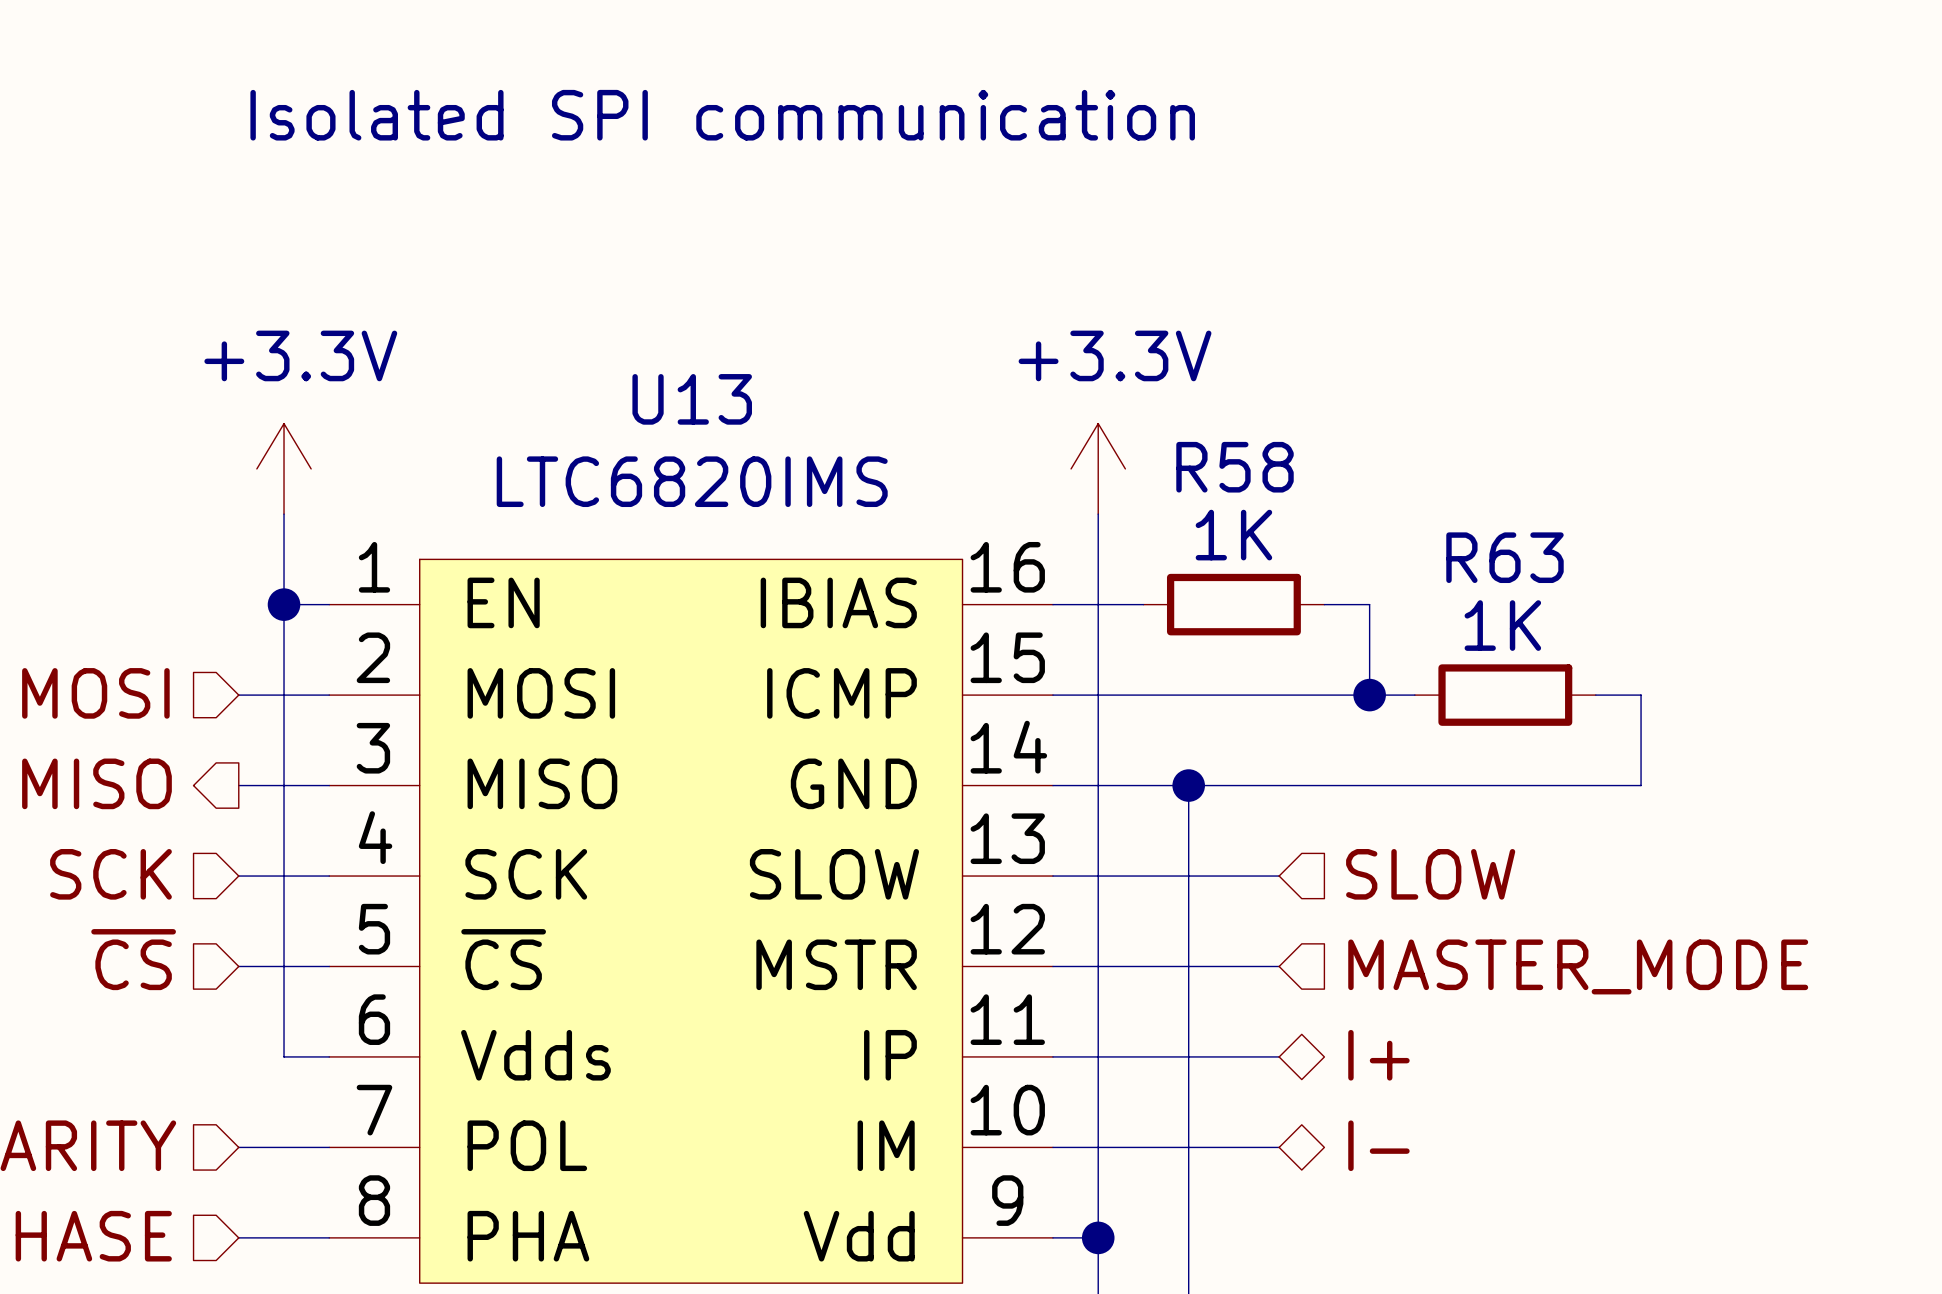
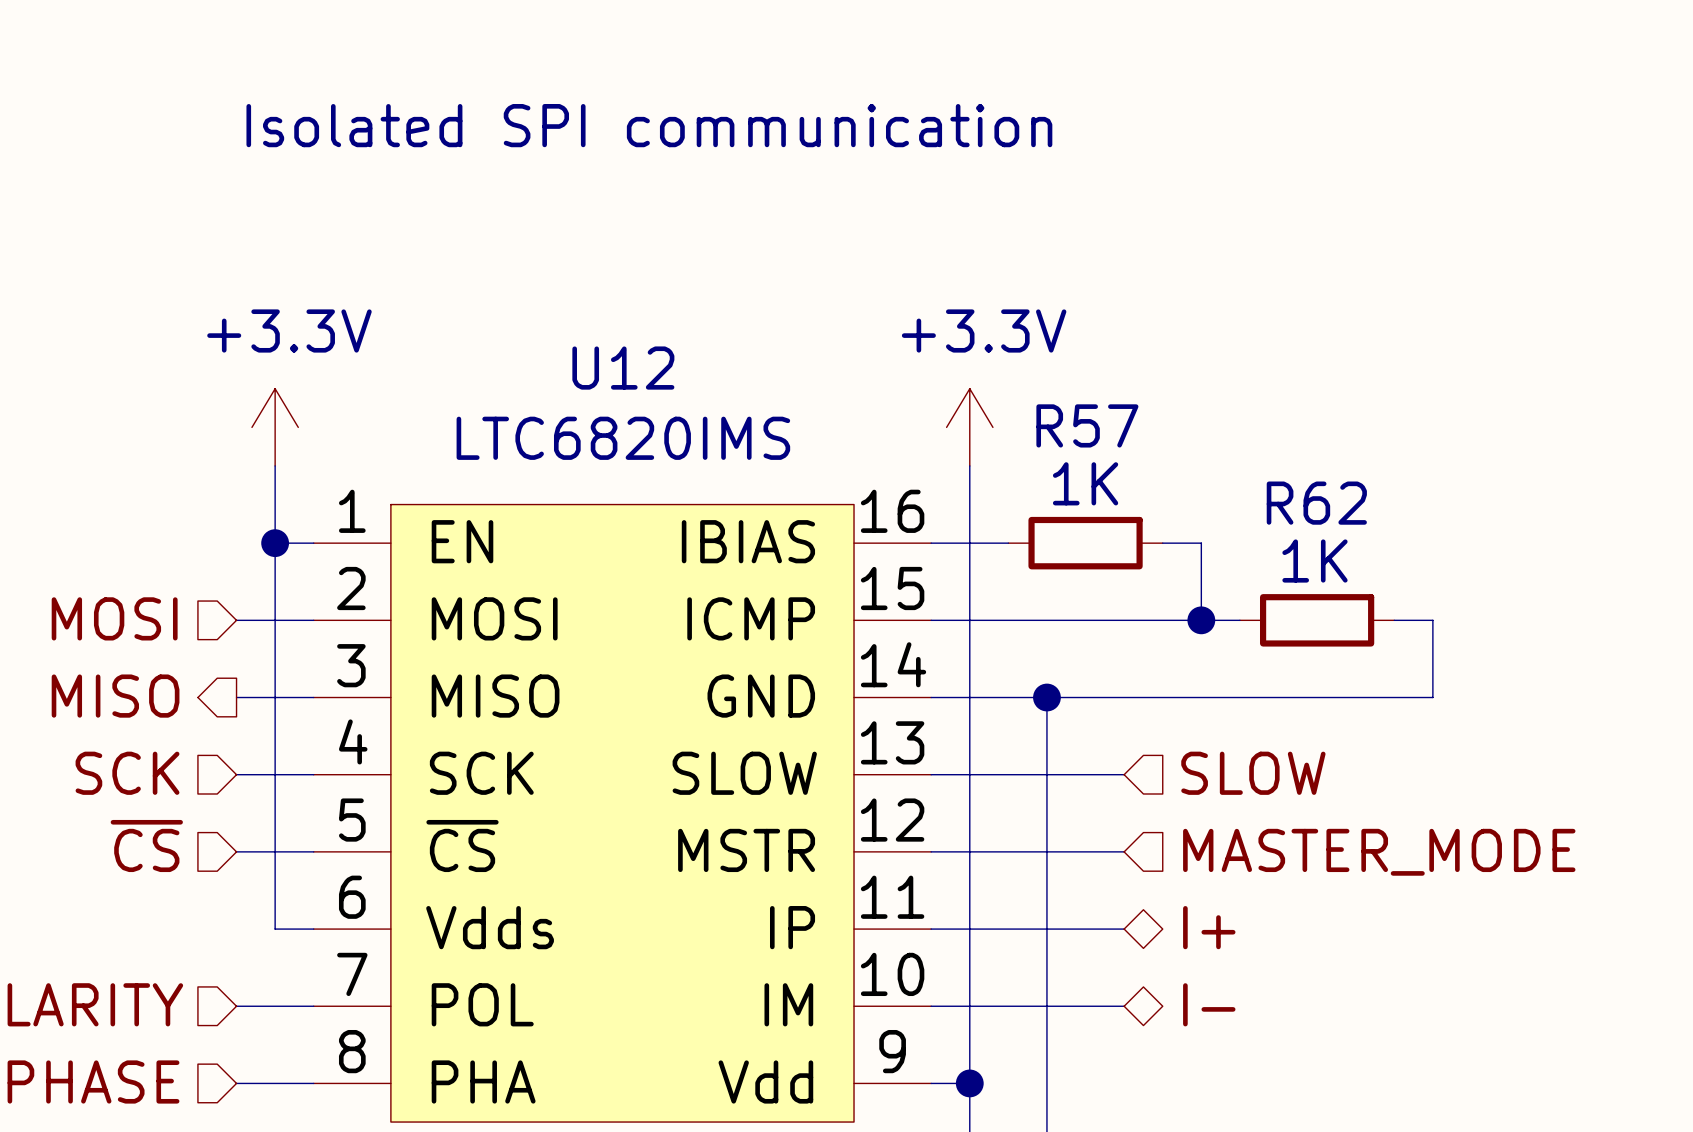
U13 name: U13 (692, 399) -> U12 (623, 368)
R58 name: R58 (1235, 467) -> R57 (1087, 425)
R63 name: R63 (1504, 557) -> R62 (1316, 503)

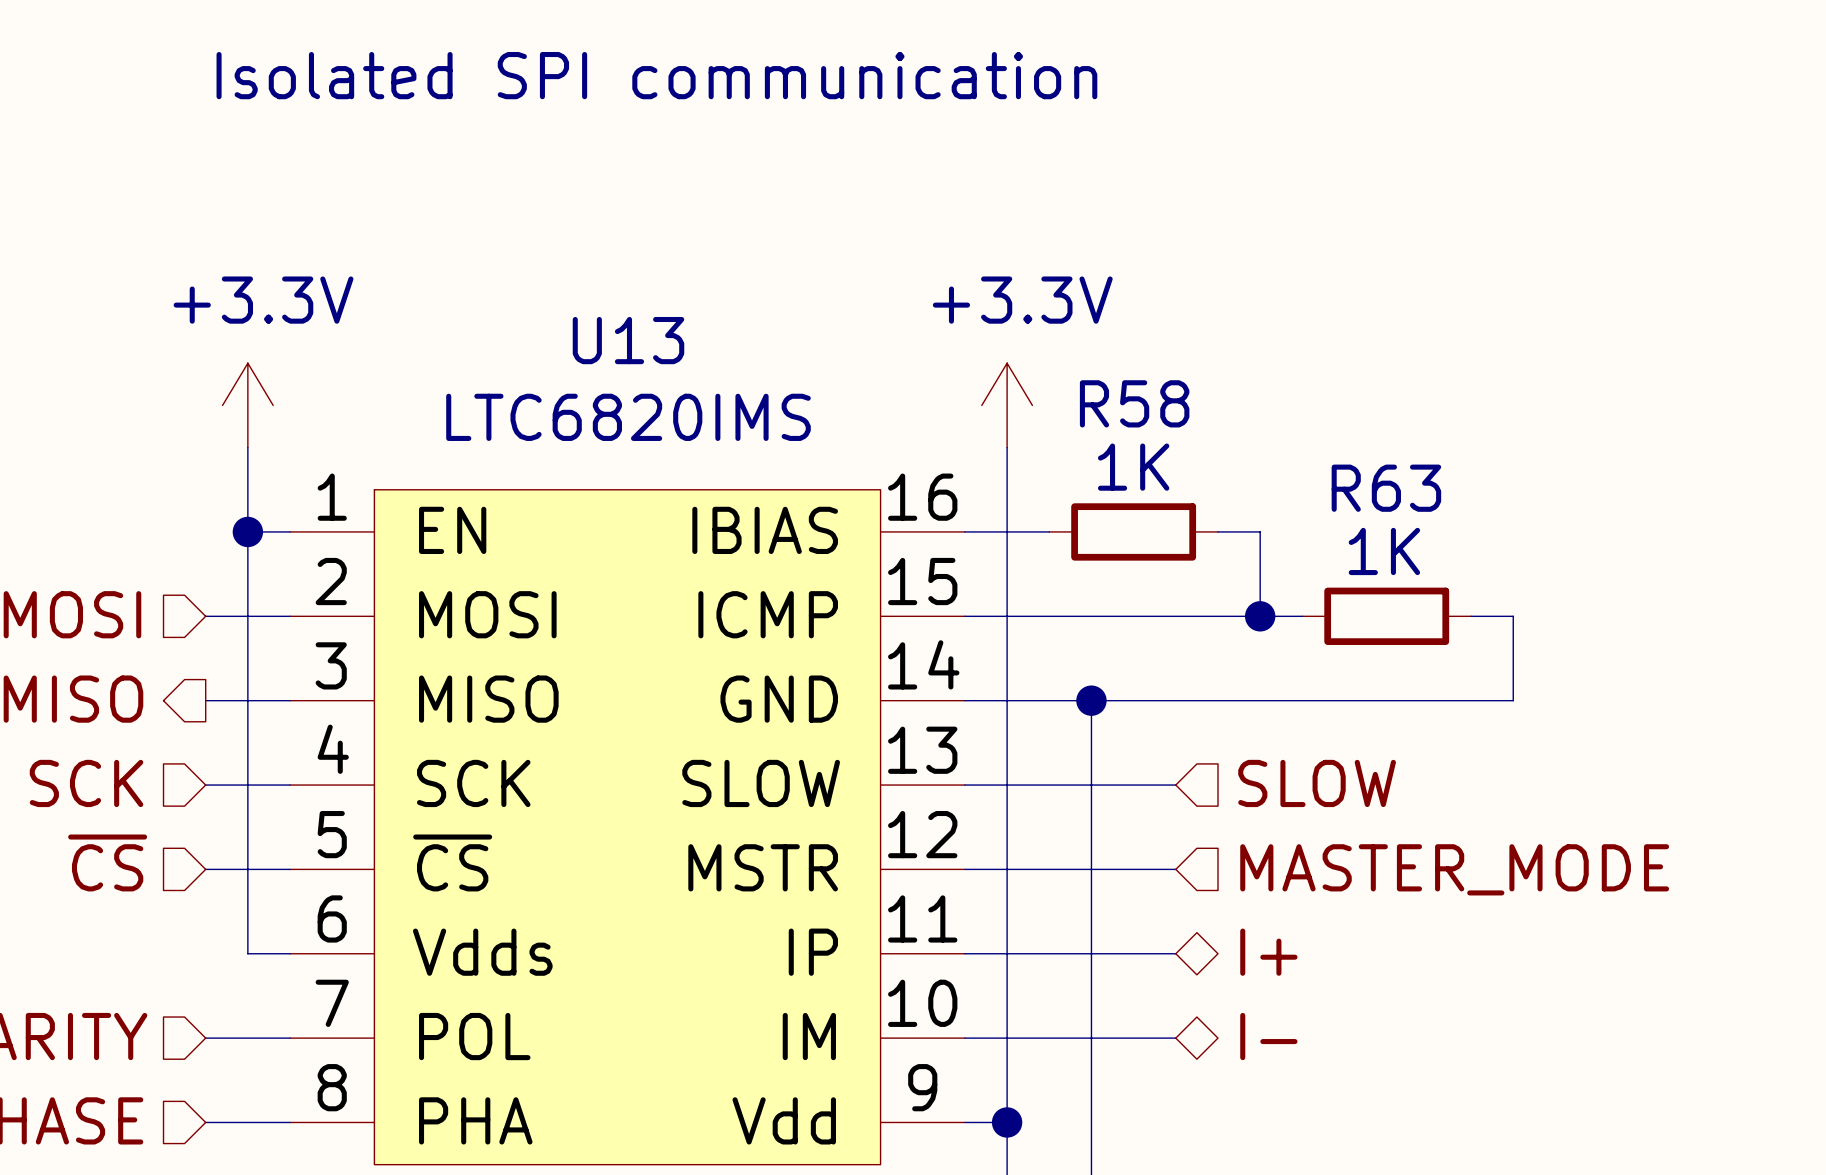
U12 name: U12 (623, 368) -> U13 (628, 340)
R57 name: R57 (1087, 425) -> R58 (1134, 403)
R62 name: R62 (1316, 503) -> R63 (1386, 488)

